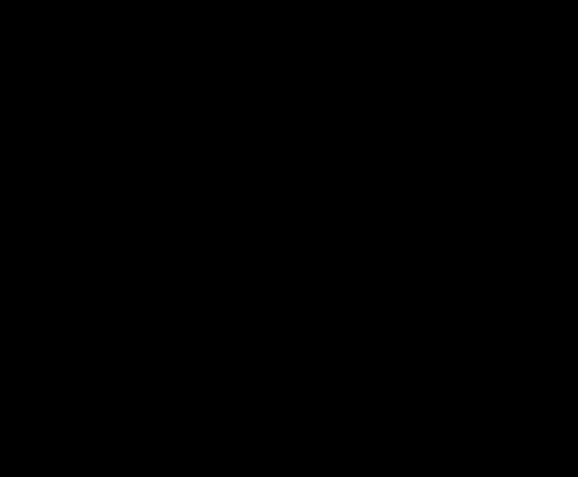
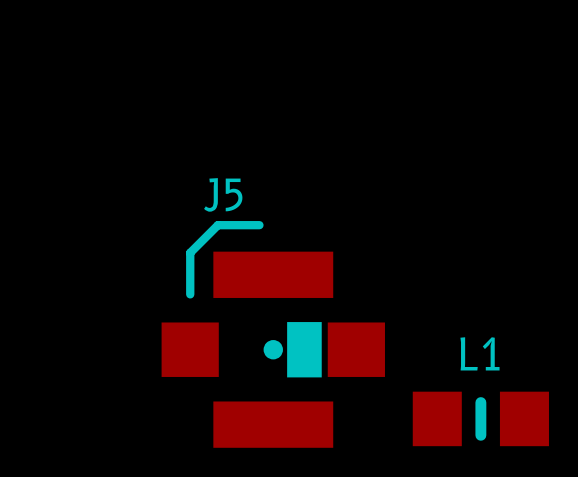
J5: none -> (273, 334)
L1: none -> (480, 418)

